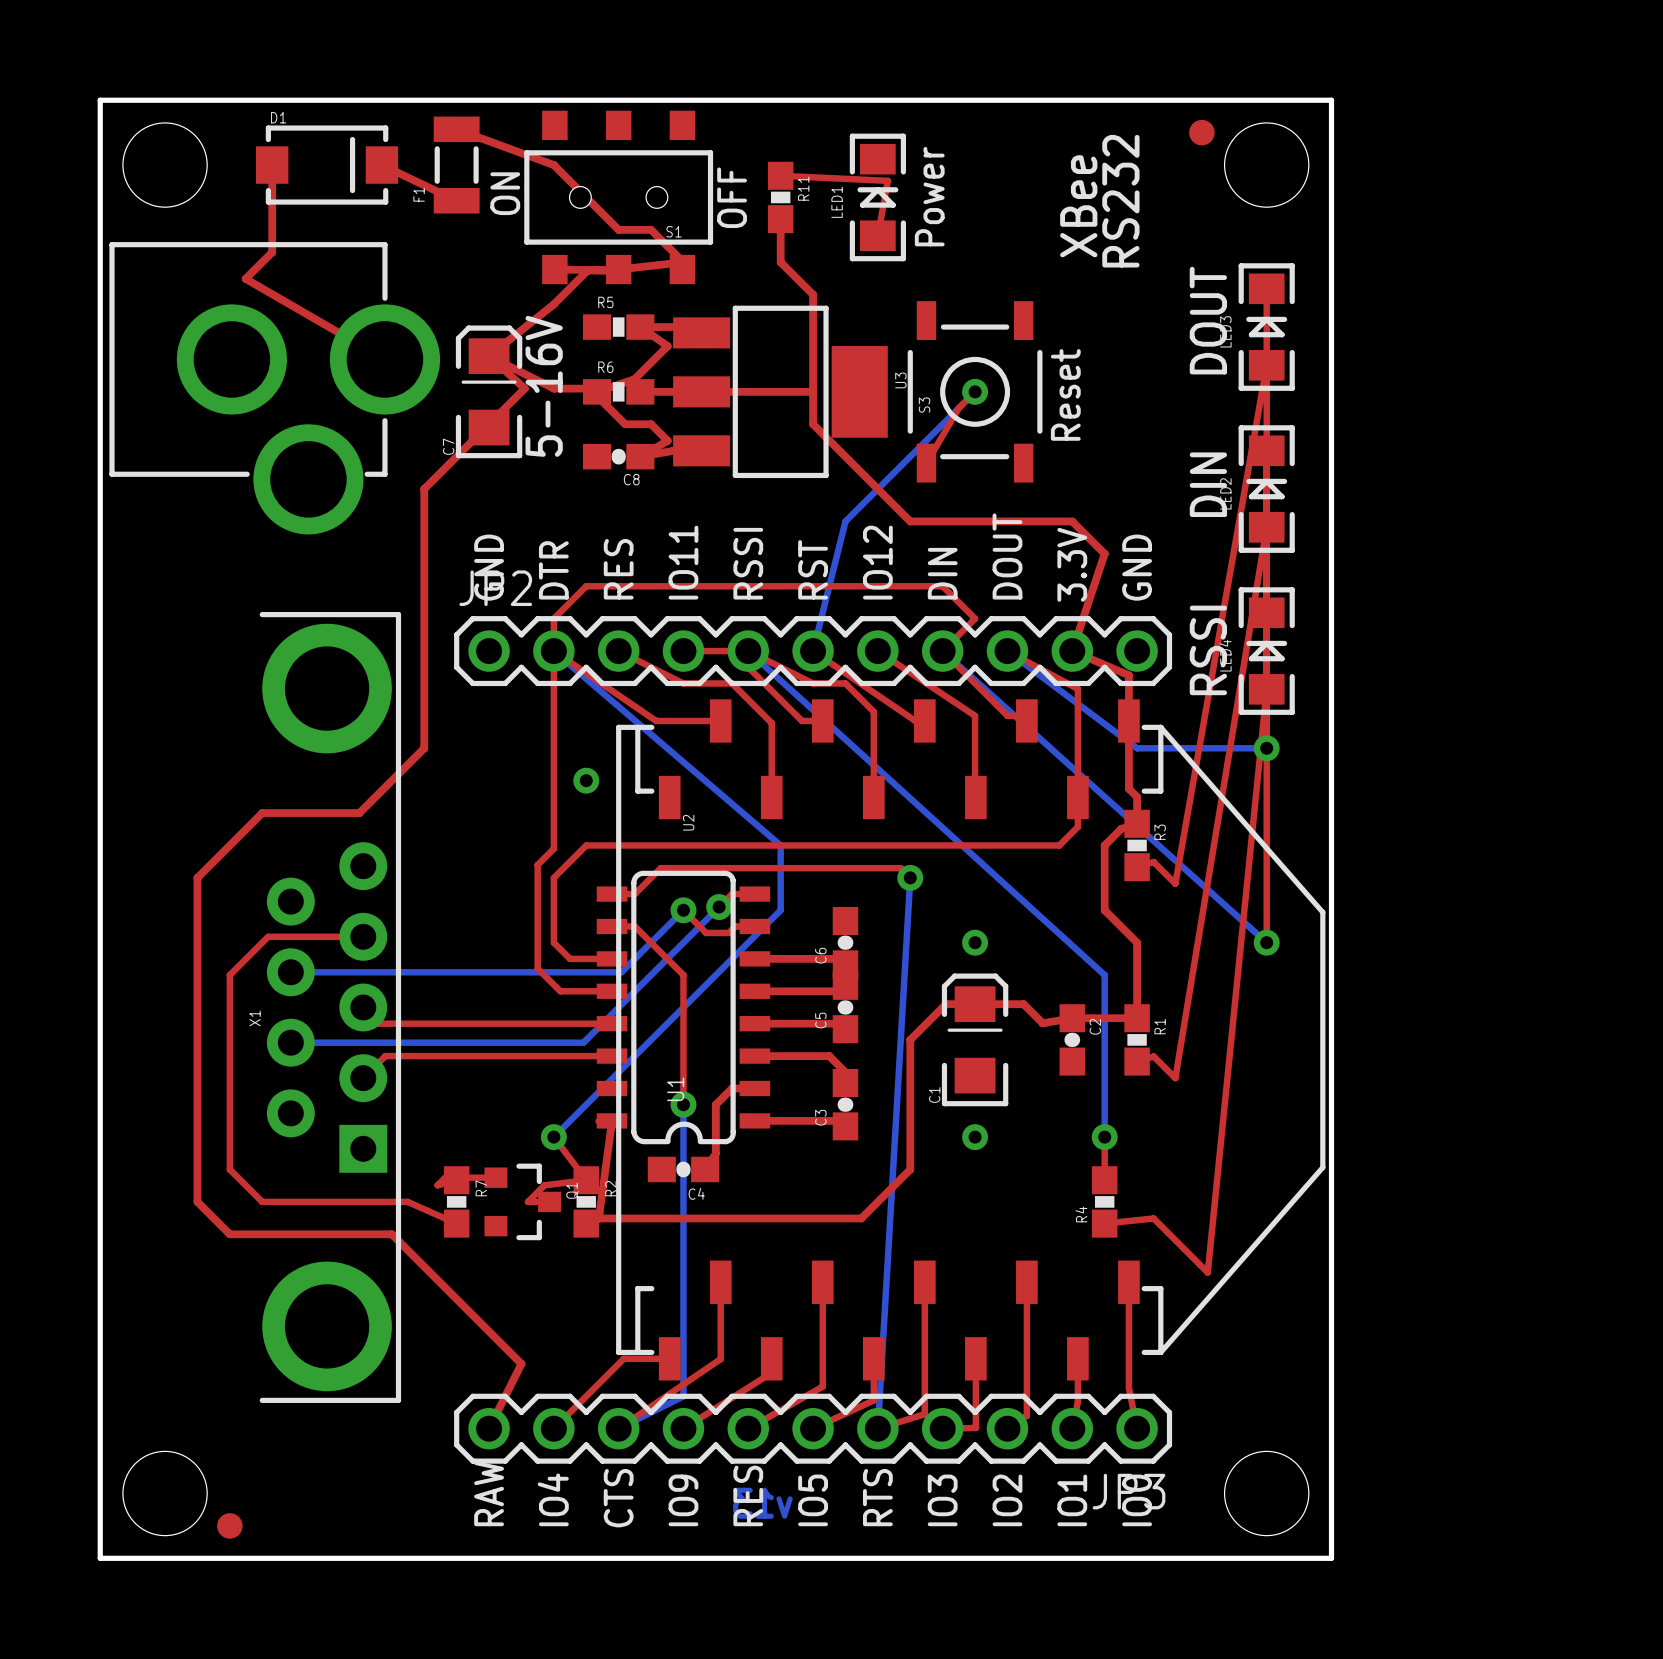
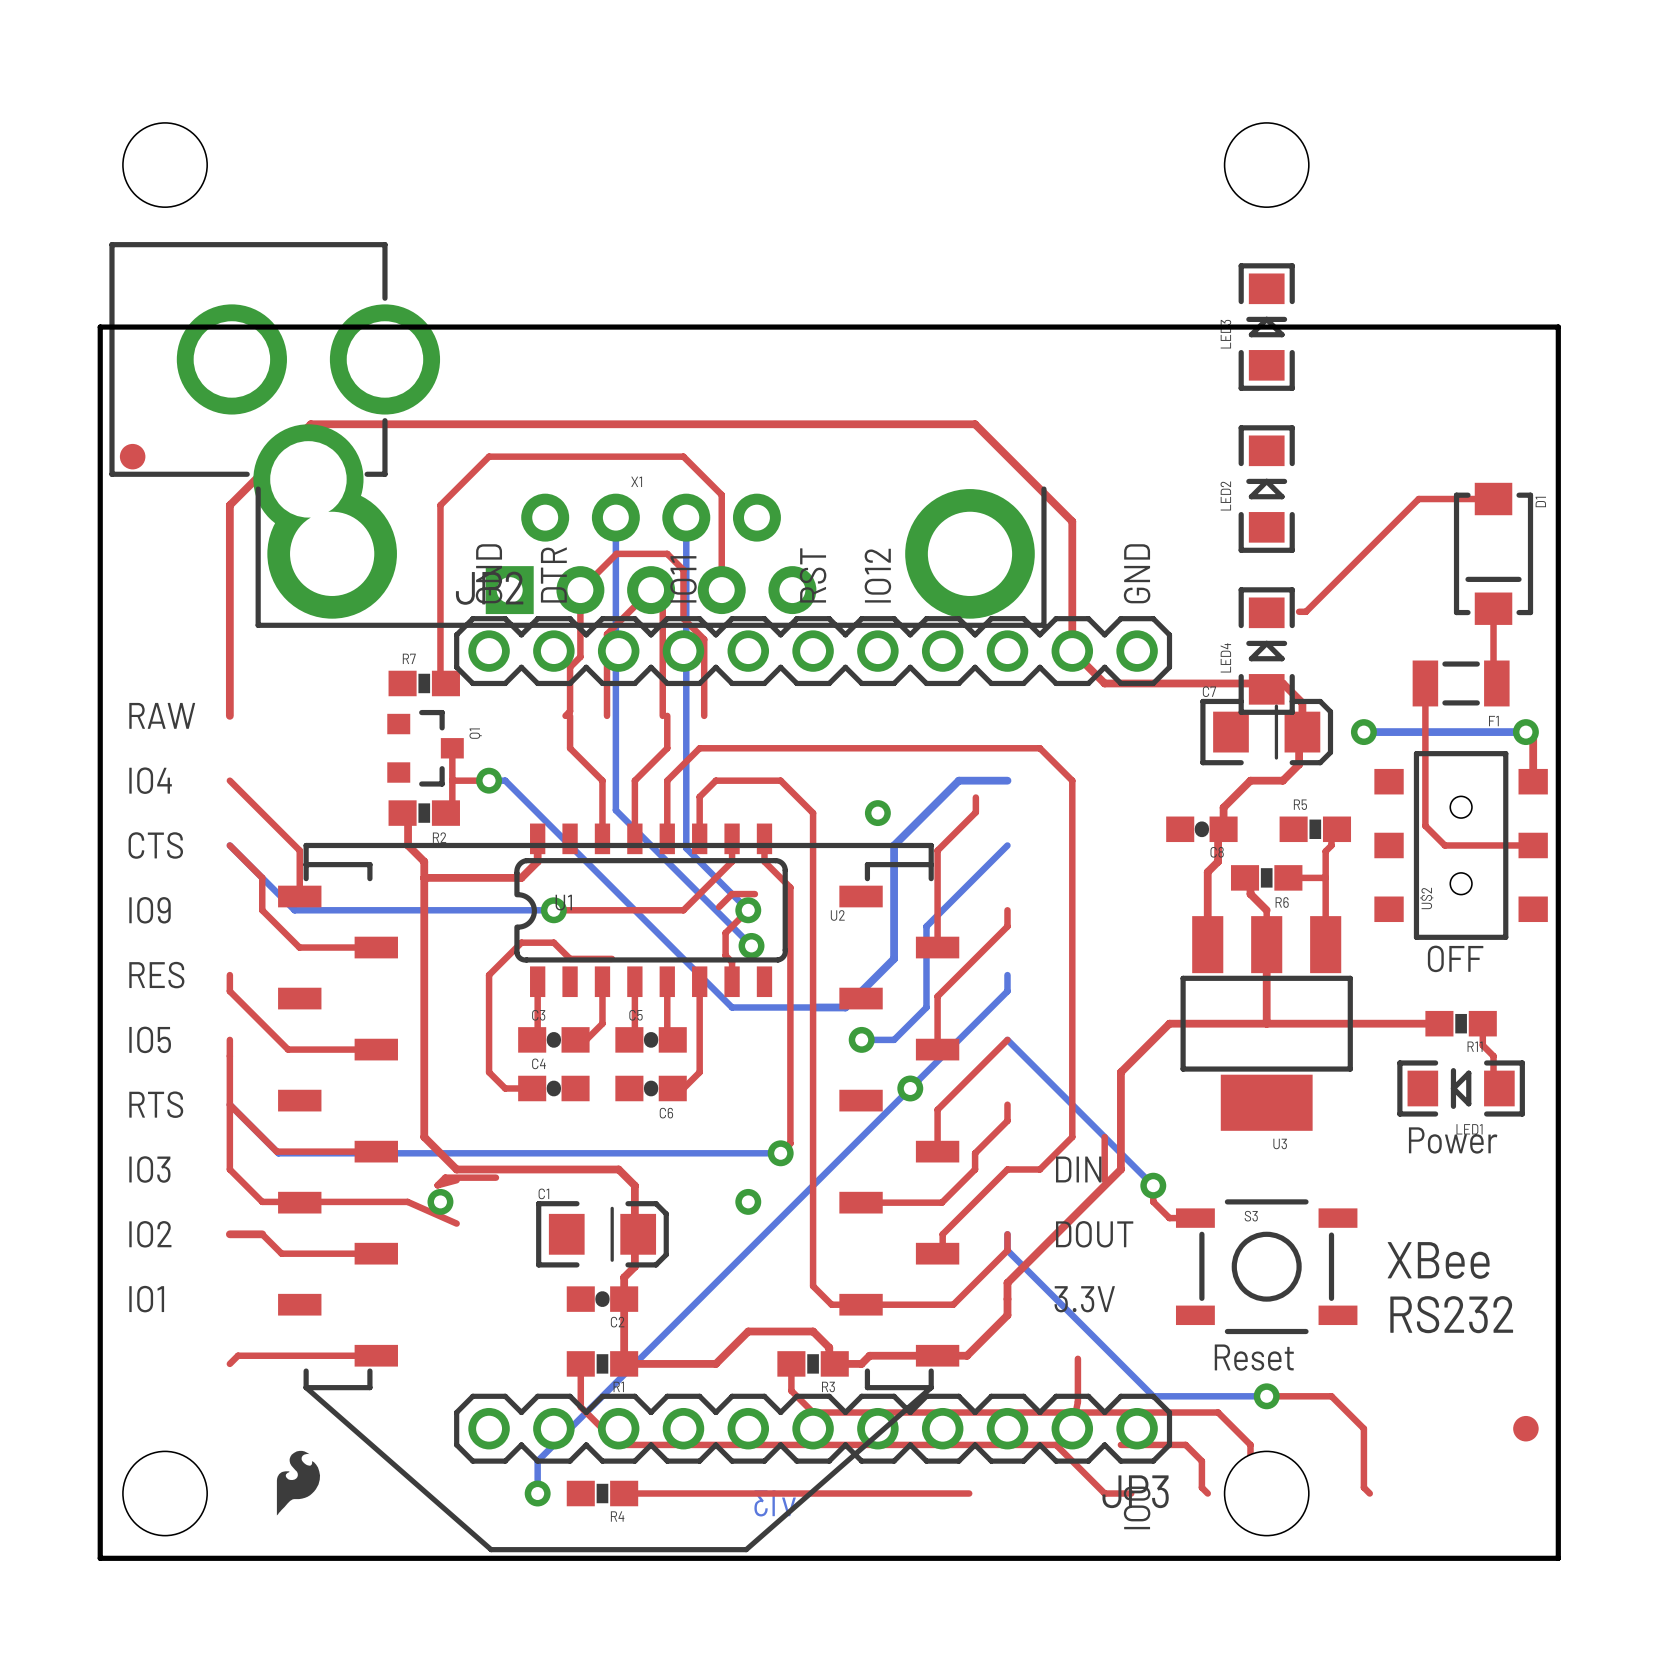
top track: (456, 129) (553, 165) (618, 229) (651, 229) (683, 262) (618, 269) -> none
part: (1201, 132) -> none
top track: (272, 165) (272, 252) (245, 278) (384, 359) -> none
D1 rotation: 0° (327, 165) -> 90° clockwise (1493, 553)
D1 position: (327, 165) -> (1493, 553)
top track: (381, 165) (456, 200) -> none
F1 rotation: 0° (456, 165) -> 90° clockwise (1461, 683)
F1 position: (456, 165) -> (1461, 683)
top track: (780, 175) (887, 180) (877, 235) -> none
text: ON (505, 193) -> none
F1 name position: F1 (419, 194) -> F1 (1493, 721)
text: Power (929, 196) -> none
S1: (618, 197) -> none
text: OFF (732, 197) -> none
R11 rotation: 0° (780, 197) -> 90° clockwise (1461, 1023)
R11 position: (780, 197) -> (1461, 1023)
LED1 rotation: 0° (877, 197) -> 90° counterclockwise (1461, 1088)
LED1 position: (877, 197) -> (1461, 1088)
text: RS232 (1120, 201) -> none
text: XBee (1078, 206) -> none
top track: (780, 219) (780, 262) (813, 294) (813, 424) (910, 521) (1072, 521) (1104, 553) (1072, 651) (1128, 675) (1128, 788) (1137, 797) (1137, 823) (1121, 828) (1104, 845) (1104, 910) (1137, 942) (1137, 1018) (1072, 1018) (1042, 1023) (1023, 1004) (946, 1004) (910, 1039) (910, 1169) (861, 1218) (599, 1218) (586, 1223) -> none
top track: (554, 269) (618, 270) (587, 270) (553, 304) (489, 356) -> none
top track: (1266, 288) (1266, 910) -> (1245, 877) (1250, 883) (1250, 894) (1266, 910)
text: DOUT (1208, 320) -> none
board edge: (100, 327) (100, 100) (1331, 100) (1331, 1558) -> (100, 327) (1558, 327) (1558, 1558) (1331, 1558)
R5 position: (618, 327) -> (1315, 829)
top track: (701, 332) (695, 332) (689, 327) (640, 327) (667, 346) (634, 379) (596, 391) -> none
top track: (489, 356) (553, 388) (589, 388) (625, 424) -> (229, 715) (229, 505) (310, 424) (625, 424)
top track: (489, 356) (524, 388) (424, 489) (424, 748) (359, 813) (262, 813) (197, 877) (197, 1201) (229, 1234) -> none
top track: (1266, 365) (1175, 883) (1153, 862) (1137, 867) -> none
R6 name position: R6 (605, 367) -> R6 (1282, 902)
text: 5-16V (544, 386) -> none
C7 rotation: 0° (489, 391) -> 90° clockwise (1266, 732)
C7 position: (489, 391) -> (1266, 732)
R6 position: (618, 391) -> (1266, 877)
top track: (640, 391) (813, 391) -> none
U3 rotation: 0° (780, 391) -> 90° clockwise (1266, 1023)
U3 position: (780, 391) -> (1266, 1023)
top track: (975, 391) (958, 408) (926, 463) -> none
bottom track: (975, 391) (845, 521) (813, 651) -> none
S3 rotation: 0° (975, 391) -> 90° clockwise (1266, 1266)
S3 position: (975, 391) -> (1266, 1266)
via: (975, 391) -> none
text: Reset (1065, 394) -> none
top track: (651, 424) (667, 440) (640, 456) (673, 450) (701, 450) -> (651, 424) (975, 424) (1072, 521) (1072, 651) (1104, 683) (1282, 683) (1302, 702) (1302, 732) (1299, 735) (1299, 764) (1282, 780) (1250, 780) (1223, 807) (1223, 829) (1218, 834) (1218, 861) (1207, 872) (1207, 944)
part: none -> (132, 456)
C8 position: (618, 456) -> (1201, 829)
text: DIN (1208, 484) -> none
top track: none -> (1493, 499) (1418, 499) (1305, 611) (1299, 611)
bottom track: none -> (615, 517) (615, 810) (751, 945)
bottom track: none -> (686, 517) (686, 848) (748, 910)
top track: (1266, 527) (1175, 1078) (1153, 1056) (1137, 1061) -> none
text: DOUT (1007, 556) -> none
text: RSSI (748, 563) -> none
text: 3.3V (1072, 564) -> none
text: RES (618, 569) -> none
text: DIN (942, 573) -> none
top track: none -> (721, 590) (721, 494) (683, 456) (489, 456) (440, 505) (440, 677) (445, 683)
top track: none -> (1493, 608) (1493, 680) (1496, 683)
text: RSSI (1208, 650) -> none
top track: (553, 651) (656, 720) (720, 720) -> none
bottom track: (553, 651) (780, 845) (780, 910) (553, 1137) -> none
top track: (618, 651) (683, 683) (732, 683) (771, 723) (771, 797) -> none
top track: (683, 651) (732, 651) (801, 720) (822, 720) -> none
top track: (748, 651) (813, 683) (845, 683) (873, 711) (873, 797) -> none
bottom track: (748, 651) (1104, 975) (1104, 1137) -> none
top track: (813, 651) (915, 720) (924, 720) -> none
top track: (877, 651) (975, 715) (975, 813) -> (937, 947) (937, 850) (975, 813)
bottom track: (942, 651) (1266, 942) -> none
top track: (1007, 651) (1077, 689) (1077, 826) (1059, 845) (586, 845) (553, 877) (553, 942) -> (532, 1088) (505, 1088) (489, 1072) (489, 975) (521, 942) (553, 942)
bottom track: (1007, 651) (1137, 748) (1266, 748) -> none
top track: none -> (1425, 683) (1425, 825) (1444, 845) (1533, 845)
top track: (1266, 689) (1207, 1272) (1153, 1218) (1104, 1223) -> none
text: none -> RAW (162, 715)
top track: none -> (565, 715) (570, 711) (570, 667) (580, 656) (580, 590) (616, 553) (667, 553) (683, 570) (683, 618) (704, 639) (704, 715)
top track: none -> (570, 715) (570, 748) (602, 780) (602, 838)
top track: none -> (607, 715) (607, 634) (651, 590) (662, 601) (662, 715)
top track: none -> (667, 715) (667, 748) (634, 780) (634, 838)
top track: (1026, 720) (1026, 715) (1007, 715) (942, 651) (975, 618) (942, 586) (586, 586) (553, 618) (553, 848) (537, 864) (537, 968) (560, 991) (612, 991) -> none
bottom track: none -> (1363, 732) (1525, 732)
top track: none -> (1525, 732) (1533, 739) (1533, 781)
via: none -> (1525, 732)
top track: none -> (452, 748) (452, 806) (445, 813)
via position: (1266, 748) -> (1363, 732)
text: none -> IO4 (150, 780)
top track: none -> (229, 780) (299, 850) (299, 896)
top track: none -> (452, 780) (489, 780)
bottom track: none -> (489, 780) (505, 780) (732, 1007) (845, 1007) (894, 958) (894, 845) (958, 780) (1007, 780)
via: none -> (489, 780)
via: (586, 780) -> none
top track: none -> (402, 813) (408, 818) (408, 845) (424, 861) (424, 1137) (456, 1169) (618, 1169) (634, 1185) (634, 1230) (638, 1234) (634, 1237) (634, 1266) (624, 1277) (624, 1363) (715, 1363) (748, 1331) (813, 1331) (829, 1347) (829, 1358) (834, 1363) (861, 1363) (869, 1355) (967, 1355) (1007, 1315) (1007, 1282) (1120, 1169) (1120, 1072) (1169, 1023) (1439, 1023)
top track: none -> (1336, 829) (1331, 834) (1331, 845) (1325, 851) (1325, 944)
top track: none -> (537, 838) (537, 861) (521, 877) (424, 877)
top track: none -> (667, 838) (667, 780) (699, 748) (1039, 748) (1072, 780) (1072, 1137) (1039, 1169) (1007, 1169) (942, 1234) (942, 1253) (937, 1253)
top track: none -> (699, 838) (699, 796) (715, 780) (780, 780) (813, 813) (813, 1286) (831, 1304) (953, 1304) (1007, 1250) (1007, 1234)
top track: none -> (732, 838) (732, 861) (683, 910) (553, 910)
top track: none -> (764, 838) (764, 861) (790, 887) (790, 1143) (780, 1153)
text: none -> CTS (155, 845)
top track: none -> (229, 845) (262, 877) (262, 910) (299, 947) (376, 947)
bottom track: none -> (229, 845) (294, 910) (553, 910)
bottom track: none -> (1007, 845) (926, 926) (926, 1007) (894, 1039) (861, 1039)
R3 rotation: 0° (1137, 845) -> 90° clockwise (813, 1363)
R3 position: (1137, 845) -> (813, 1363)
U$2: none -> (1461, 845)
top track: (910, 877) (900, 868) (660, 868) (634, 894) (612, 894) -> none
bottom track: (910, 877) (877, 1428) -> none
via position: (910, 877) -> (877, 813)
top track: none -> (1288, 877) (1325, 877)
bottom track: (719, 907) (583, 1042) (290, 1042) -> none
via: (719, 907) -> none
text: none -> IO9 (150, 910)
via: none -> (553, 910)
top track: (683, 910) (706, 932) (728, 932) (735, 926) (754, 926) -> none
bottom track: (683, 910) (621, 972) (290, 972) -> none
via: (683, 910) -> none
top track: none -> (748, 910) (725, 932) (725, 955) (732, 962) (732, 981)
via: none -> (748, 910)
top track: none -> (1007, 910) (1007, 926) (937, 996) (937, 1049)
top track: (612, 926) (634, 926) (683, 975) (683, 1104) -> none
top track: (363, 936) (268, 936) (229, 975) -> none
C6 rotation: 0° (845, 942) -> 90° clockwise (651, 1088)
C6 position: (845, 942) -> (651, 1088)
via: (975, 942) -> none
top track: none -> (1266, 942) (1266, 1023)
via: (1266, 942) -> none
via: none -> (751, 945)
top track: (754, 958) (845, 958) (845, 964) -> none
text: none -> OFF (1455, 958)
text: none -> RES (156, 975)
bottom track: none -> (1007, 975) (1007, 991) (537, 1461) (537, 1493)
top track: none -> (537, 981) (537, 1034) (532, 1039)
top track: none -> (602, 981) (602, 1023) (586, 1039) (575, 1039)
top track: none -> (634, 981) (634, 1034) (629, 1039)
top track: none -> (667, 981) (667, 1034) (672, 1039)
top track: none -> (699, 981) (699, 1072) (683, 1088) (672, 1088)
top track: (845, 985) (845, 991) (754, 991) -> none
top track: (229, 991) (229, 1039) -> (229, 991) (288, 1049) (376, 1049)
X1 rotation: 0° (330, 1007) -> 90° clockwise (651, 557)
X1 position: (330, 1007) -> (651, 557)
top track: (363, 1007) (379, 1023) (612, 1023) -> none
U1 rotation: 0° (683, 1007) -> 90° clockwise (651, 910)
C5 rotation: 0° (845, 1007) -> 90° clockwise (651, 1039)
C5 position: (845, 1007) -> (651, 1039)
top track: (754, 1023) (845, 1023) (845, 1029) -> none
top track: none -> (1482, 1023) (1482, 1045) (1493, 1056) (1493, 1082) (1499, 1088)
text: none -> IO5 (150, 1039)
via: none -> (861, 1039)
U2 rotation: 0° (970, 1039) -> 90° clockwise (618, 1197)
C1 rotation: 0° (975, 1039) -> 90° clockwise (602, 1234)
C1 position: (975, 1039) -> (602, 1234)
top track: none -> (1007, 1039) (937, 1109) (937, 1151)
bottom track: none -> (1007, 1039) (1153, 1185)
C2 rotation: 0° (1072, 1039) -> 90° clockwise (602, 1299)
C2 position: (1072, 1039) -> (602, 1299)
R1 rotation: 0° (1137, 1039) -> 90° clockwise (602, 1363)
R1 position: (1137, 1039) -> (602, 1363)
top track: (612, 1056) (385, 1056) (363, 1078) -> none
top track: (754, 1056) (829, 1056) (845, 1072) (845, 1083) -> none
top track: (754, 1088) (732, 1088) (715, 1104) (715, 1153) (705, 1169) -> none
via: none -> (910, 1088)
text: none -> RTS (156, 1104)
top track: none -> (229, 1104) (276, 1151) (376, 1151) (375, 1156)
bottom track: none -> (229, 1104) (278, 1153) (780, 1153)
bottom track: (683, 1104) (683, 1396) (618, 1428) -> none
via: (683, 1104) -> none
C3 rotation: 0° (845, 1104) -> 90° clockwise (553, 1039)
C3 position: (845, 1104) -> (553, 1039)
top track: none -> (1007, 1104) (1007, 1120) (975, 1153) (975, 1169) (941, 1202) (861, 1202)
top track: (754, 1120) (845, 1120) (845, 1126) -> none
top track: (599, 1121) (612, 1120) (598, 1218) -> none
top track: (553, 1137) (586, 1180) (544, 1185) (527, 1201) (549, 1201) -> none
via: (553, 1137) -> none
via: (975, 1137) -> none
via position: (1104, 1137) -> (1153, 1185)
text: none -> Power (1453, 1140)
via: none -> (780, 1153)
text: none -> IO3 (149, 1169)
C4 position: (683, 1169) -> (553, 1088)
text: none -> DIN (1078, 1169)
top track: none -> (1153, 1185) (1153, 1201) (1169, 1218) (1195, 1218)
C4 name position: C4 (696, 1193) -> C4 (538, 1063)
via: none -> (440, 1201)
R7 rotation: 0° (456, 1201) -> 90° clockwise (424, 683)
R7 position: (456, 1201) -> (424, 683)
Q1 position: (522, 1201) -> (425, 748)
R2 rotation: 0° (586, 1201) -> 90° clockwise (424, 813)
R2 position: (586, 1201) -> (424, 813)
via: none -> (748, 1201)
R4 rotation: 0° (1104, 1201) -> 90° clockwise (602, 1493)
R4 position: (1104, 1201) -> (602, 1493)
text: none -> IO2 (150, 1234)
top track: (262, 1234) (391, 1234) (521, 1363) (489, 1428) -> (262, 1234) (281, 1253) (376, 1253)
bottom track: none -> (1007, 1234) (1007, 1250) (1153, 1396) (1266, 1396)
text: none -> DOUT (1094, 1234)
text: none -> XBee (1438, 1260)
top track: (720, 1282) (720, 1359) (618, 1428) -> none
top track: (822, 1282) (822, 1386) (748, 1428) -> none
top track: (929, 1282) (924, 1282) (924, 1414) (877, 1428) -> none
top track: (1026, 1282) (1026, 1415) (1007, 1428) -> none
top track: (1128, 1282) (1128, 1388) (1137, 1428) -> none
text: none -> IO1 (146, 1299)
text: none -> 3.3V (1084, 1299)
text: none -> RS232 (1451, 1314)
top track: none -> (376, 1355) (238, 1355) (229, 1363)
text: none -> Reset (1254, 1357)
top track: (669, 1358) (623, 1358) (553, 1428) -> none
top track: (771, 1358) (771, 1372) (683, 1428) -> none
top track: (873, 1358) (873, 1400) (813, 1428) -> none
top track: (975, 1358) (975, 1427) (942, 1428) -> none
top track: none -> (580, 1363) (580, 1407) (618, 1444) (1056, 1444) (1104, 1493) (1131, 1493)
top track: none -> (791, 1363) (791, 1390) (813, 1412) (1218, 1412) (1250, 1444) (1250, 1477) (1266, 1493) (1293, 1493)
top track: none -> (1266, 1396) (1331, 1396) (1363, 1428) (1363, 1487) (1369, 1493)
via: none -> (1266, 1396)
part: none -> (1525, 1428)
top track: none -> (1120, 1444) (1185, 1444) (1201, 1461) (1201, 1487) (1207, 1493)
drawing: none -> [276, 1450, 321, 1516]
text: RAW (489, 1493) -> none
via: none -> (537, 1493)
top track: none -> (624, 1493) (969, 1493)
text: RES (748, 1495) -> none
text: RTS (877, 1497) -> none
text: CTS (618, 1498) -> none
text: IO4 (553, 1499) -> none
text: IO9 (683, 1500) -> none
text: IO5 (813, 1500) -> none
text: IO3 (942, 1500) -> none
text: IO2 (1007, 1500) -> none
text: IO1 (1072, 1500) -> none
part: (229, 1525) -> none

